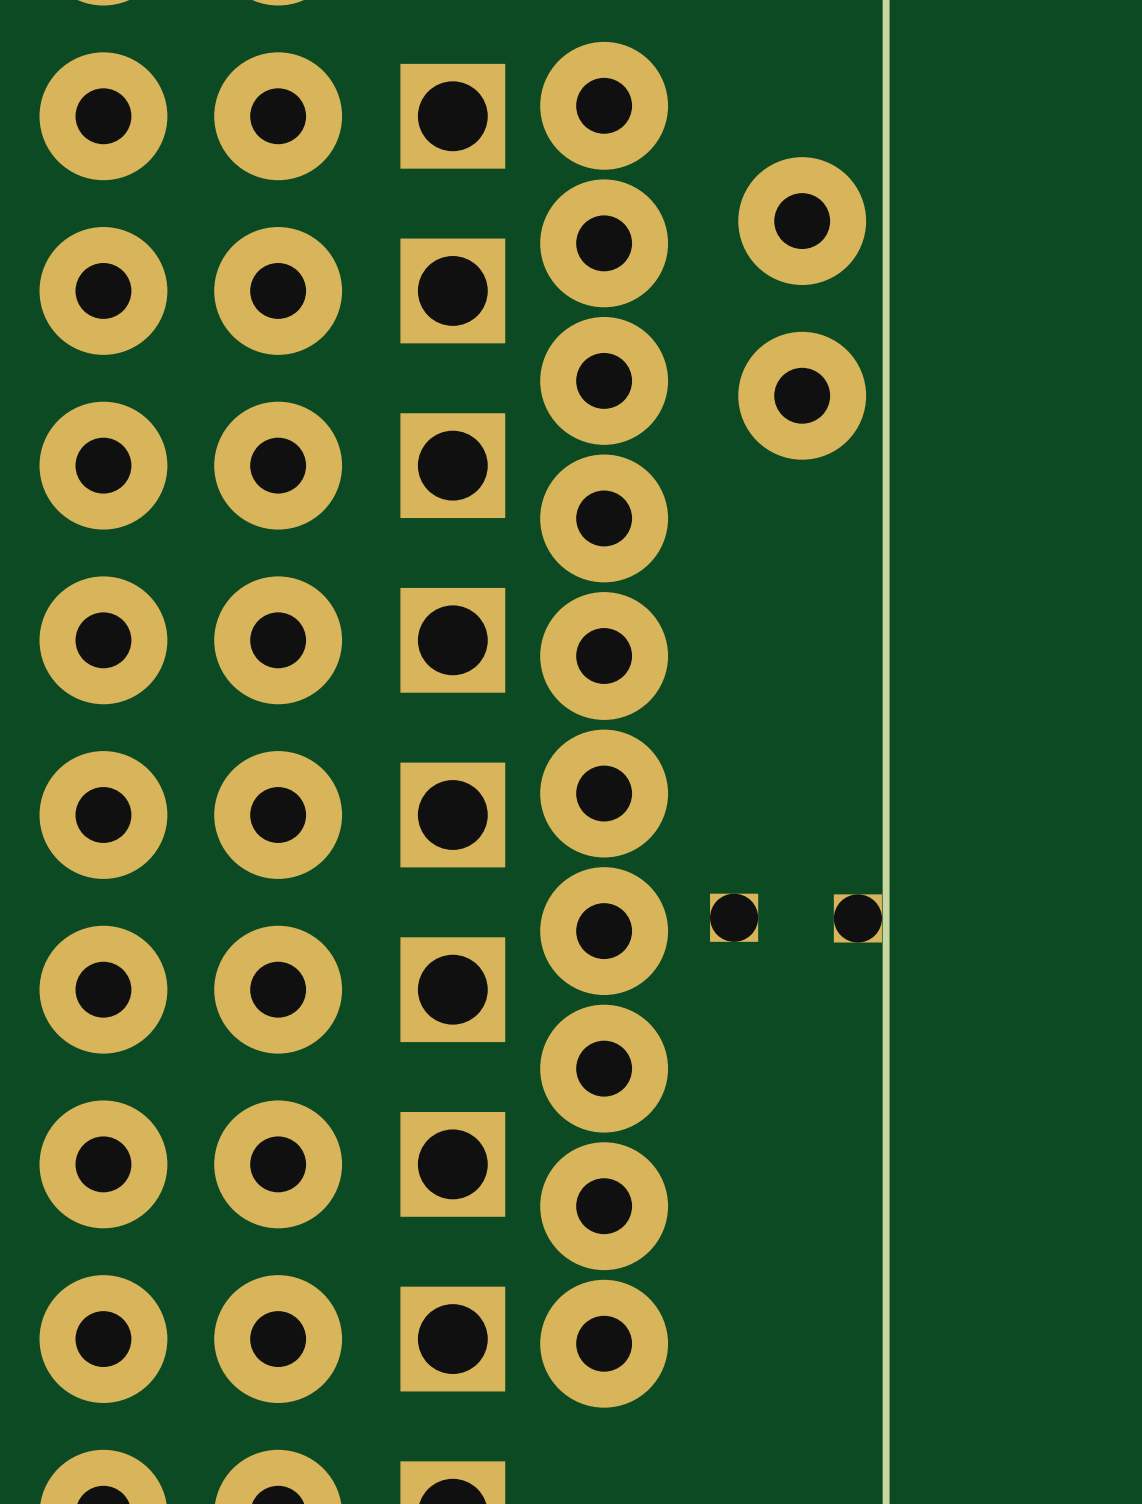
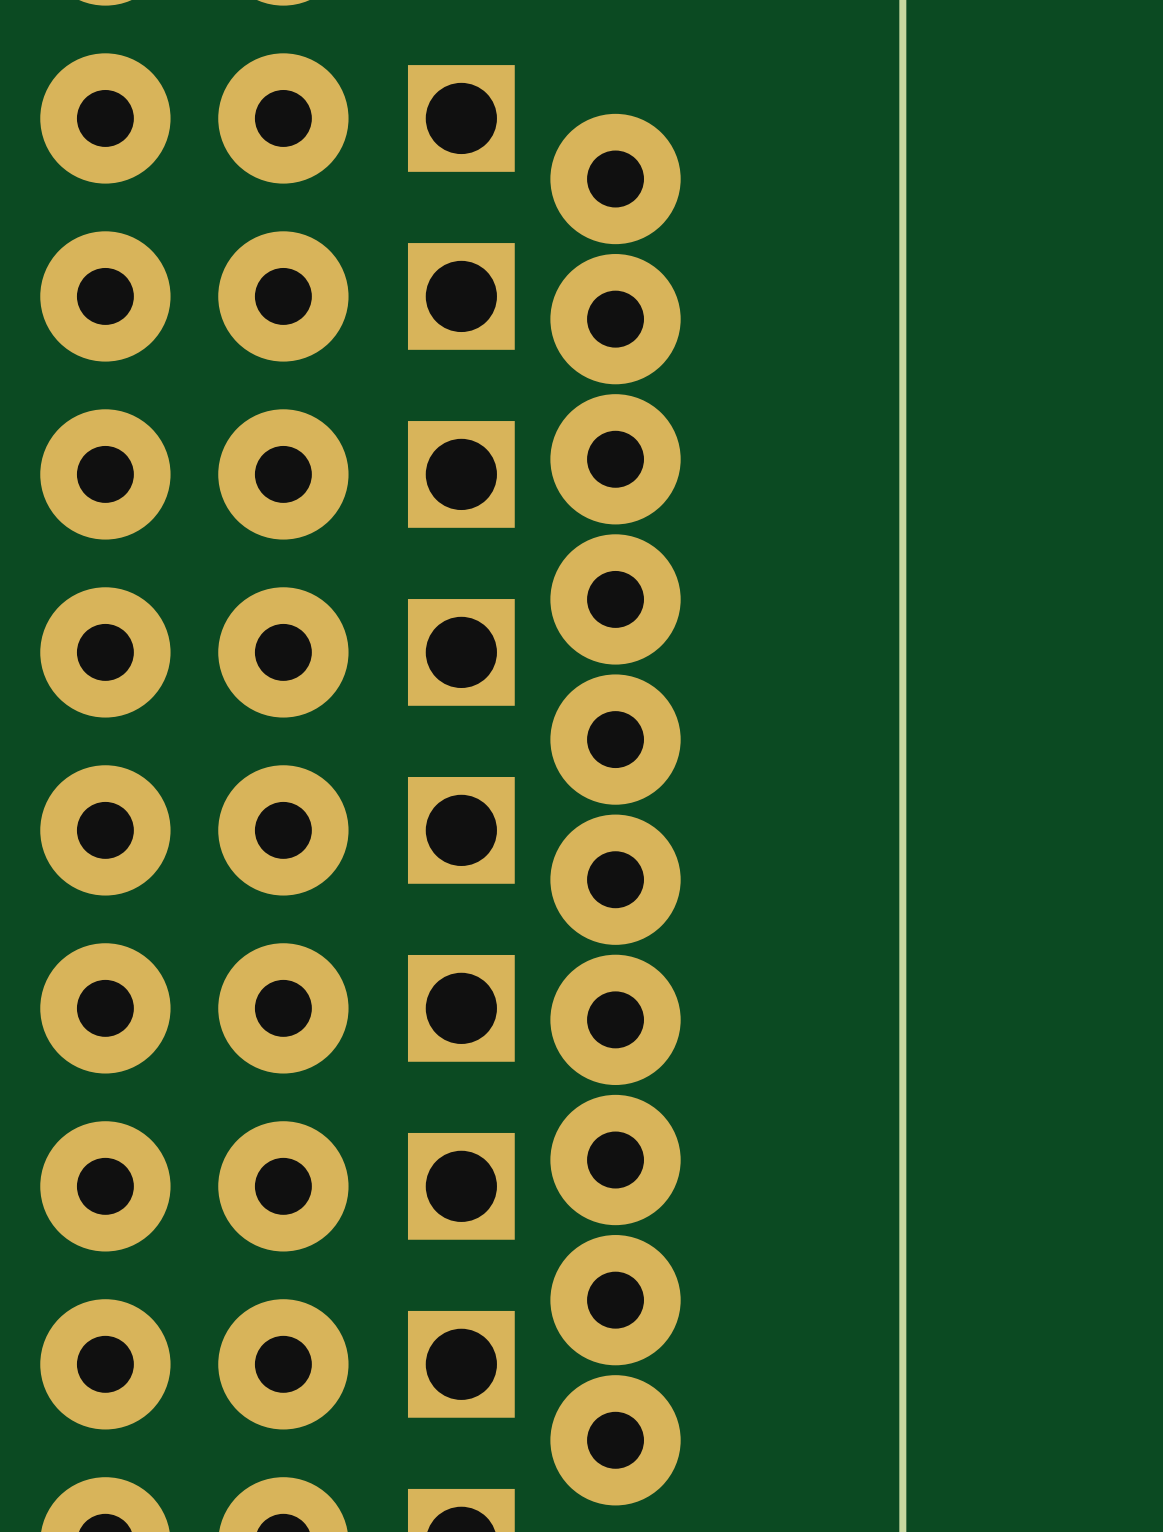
part: (802, 221) -> none
part: (802, 395) -> none
part position: (604, 724) -> (615, 809)
part: (796, 918) -> none

